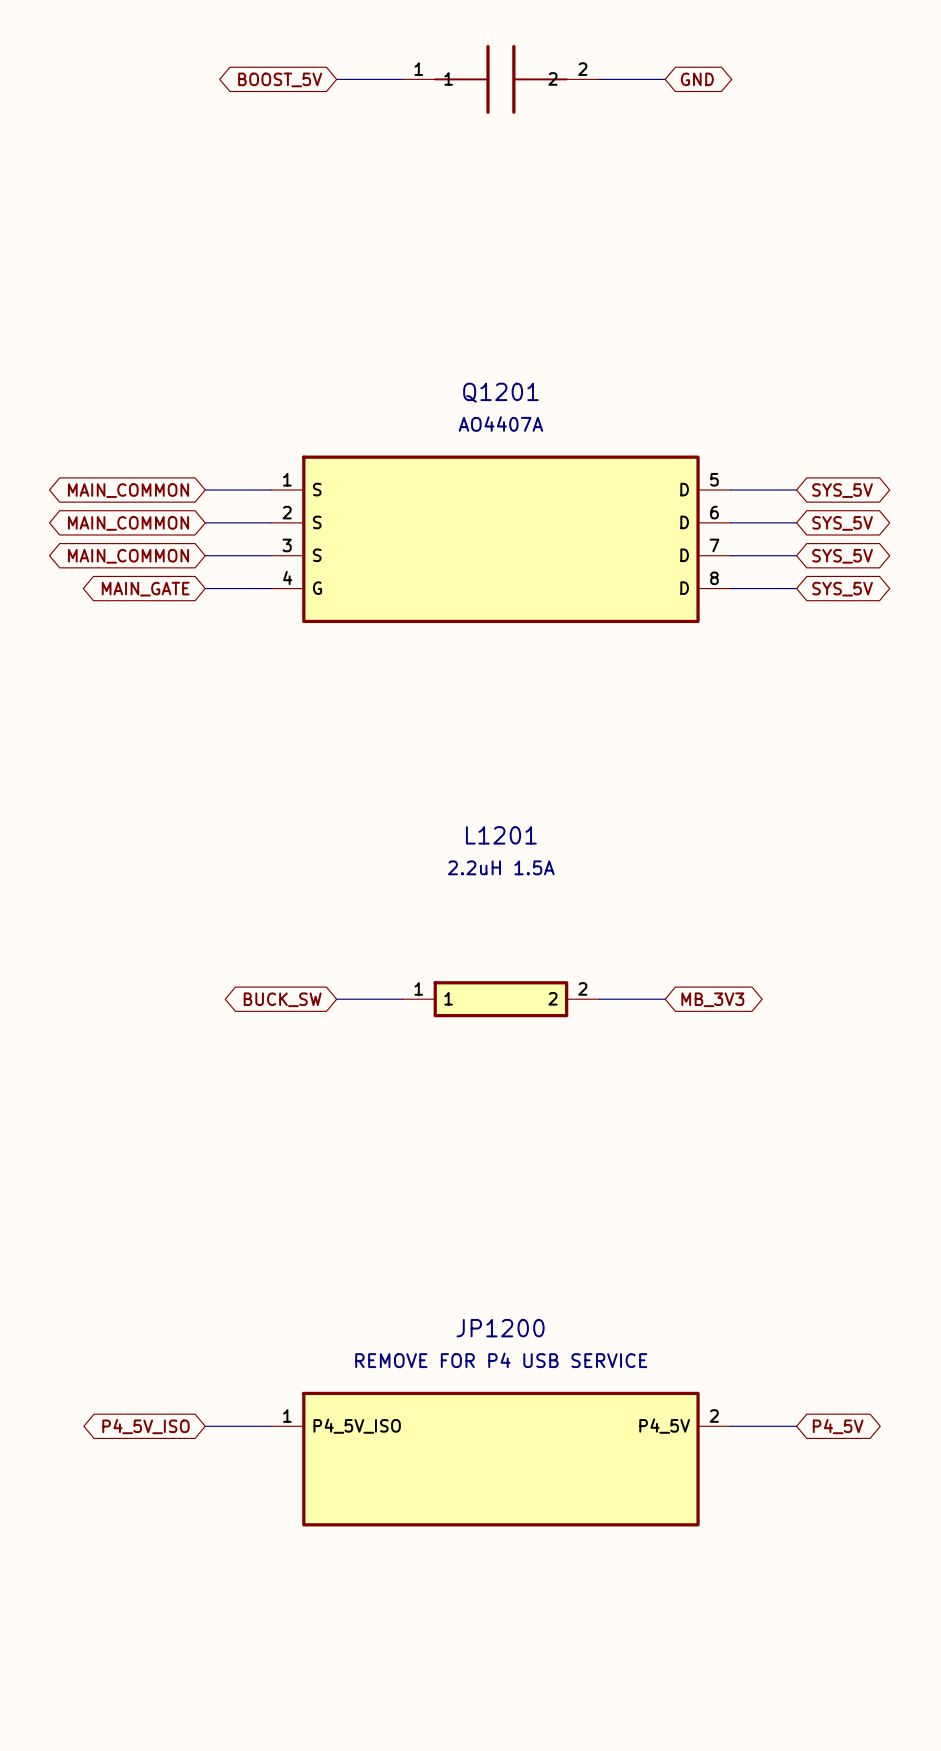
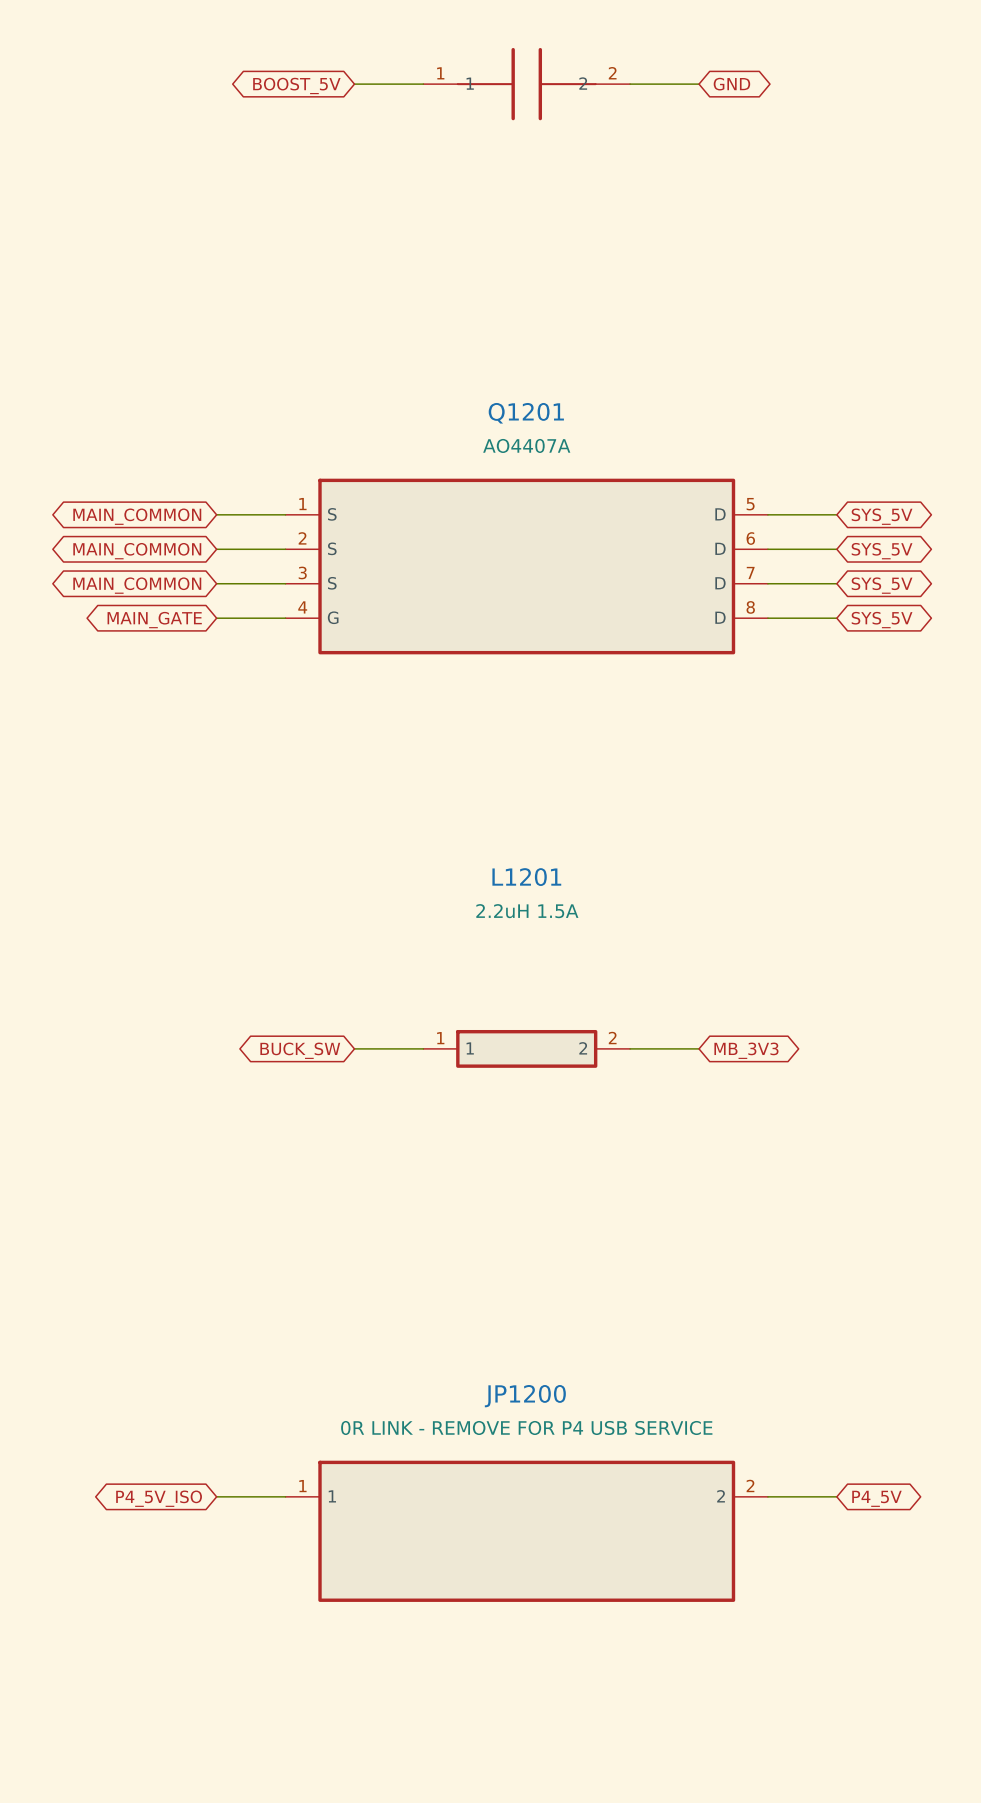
JP1200 value: REMOVE FOR P4 USB SERVICE (501, 1360) -> 0R LINK - REMOVE FOR P4 USB SERVICE (526, 1427)
JP1200 pin name: P4_5V_ISO (357, 1426) -> 1 (332, 1496)
JP1200 pin name: P4_5V (664, 1426) -> 2 (721, 1496)

